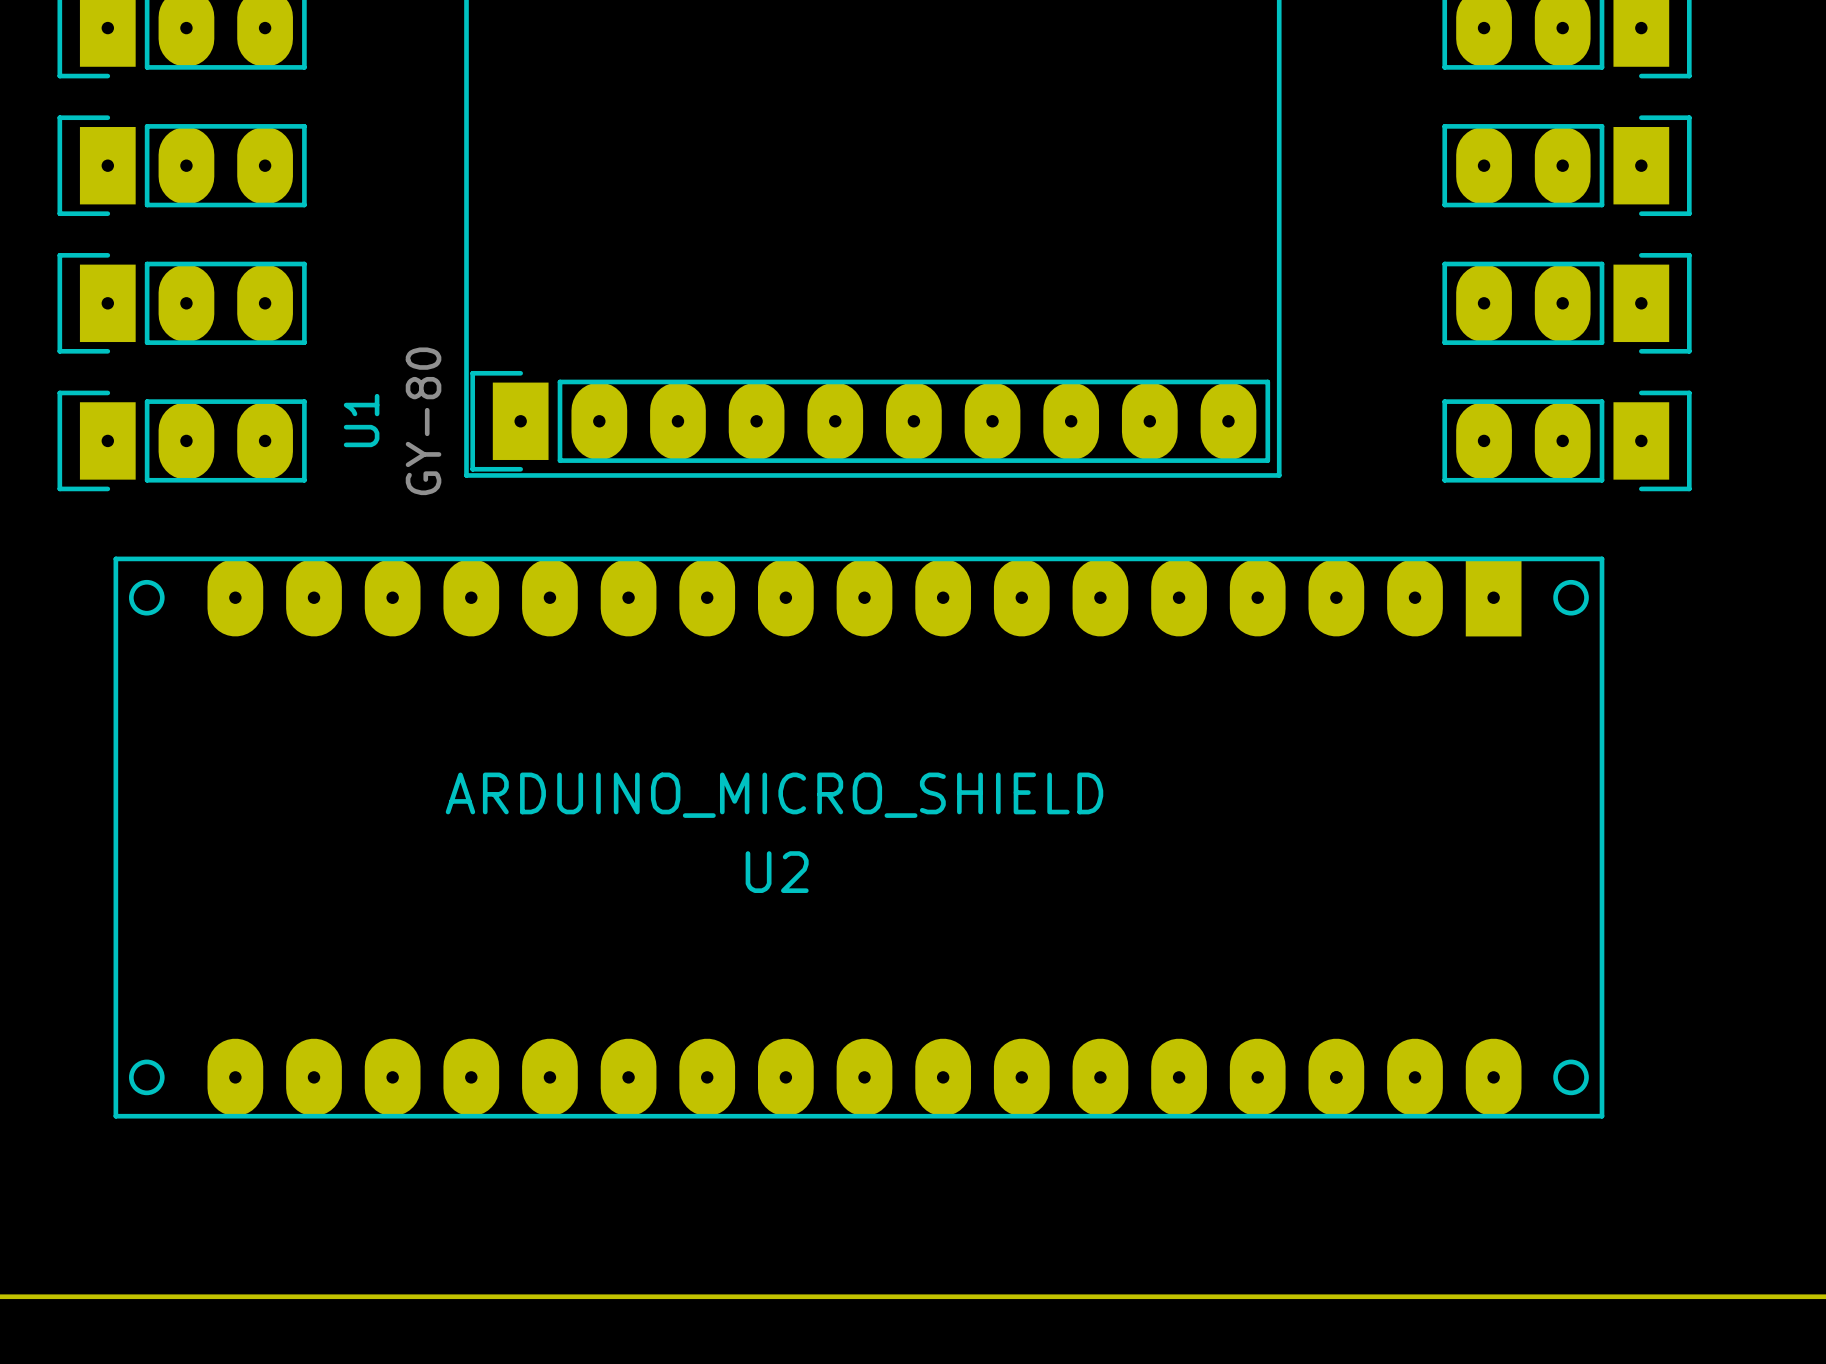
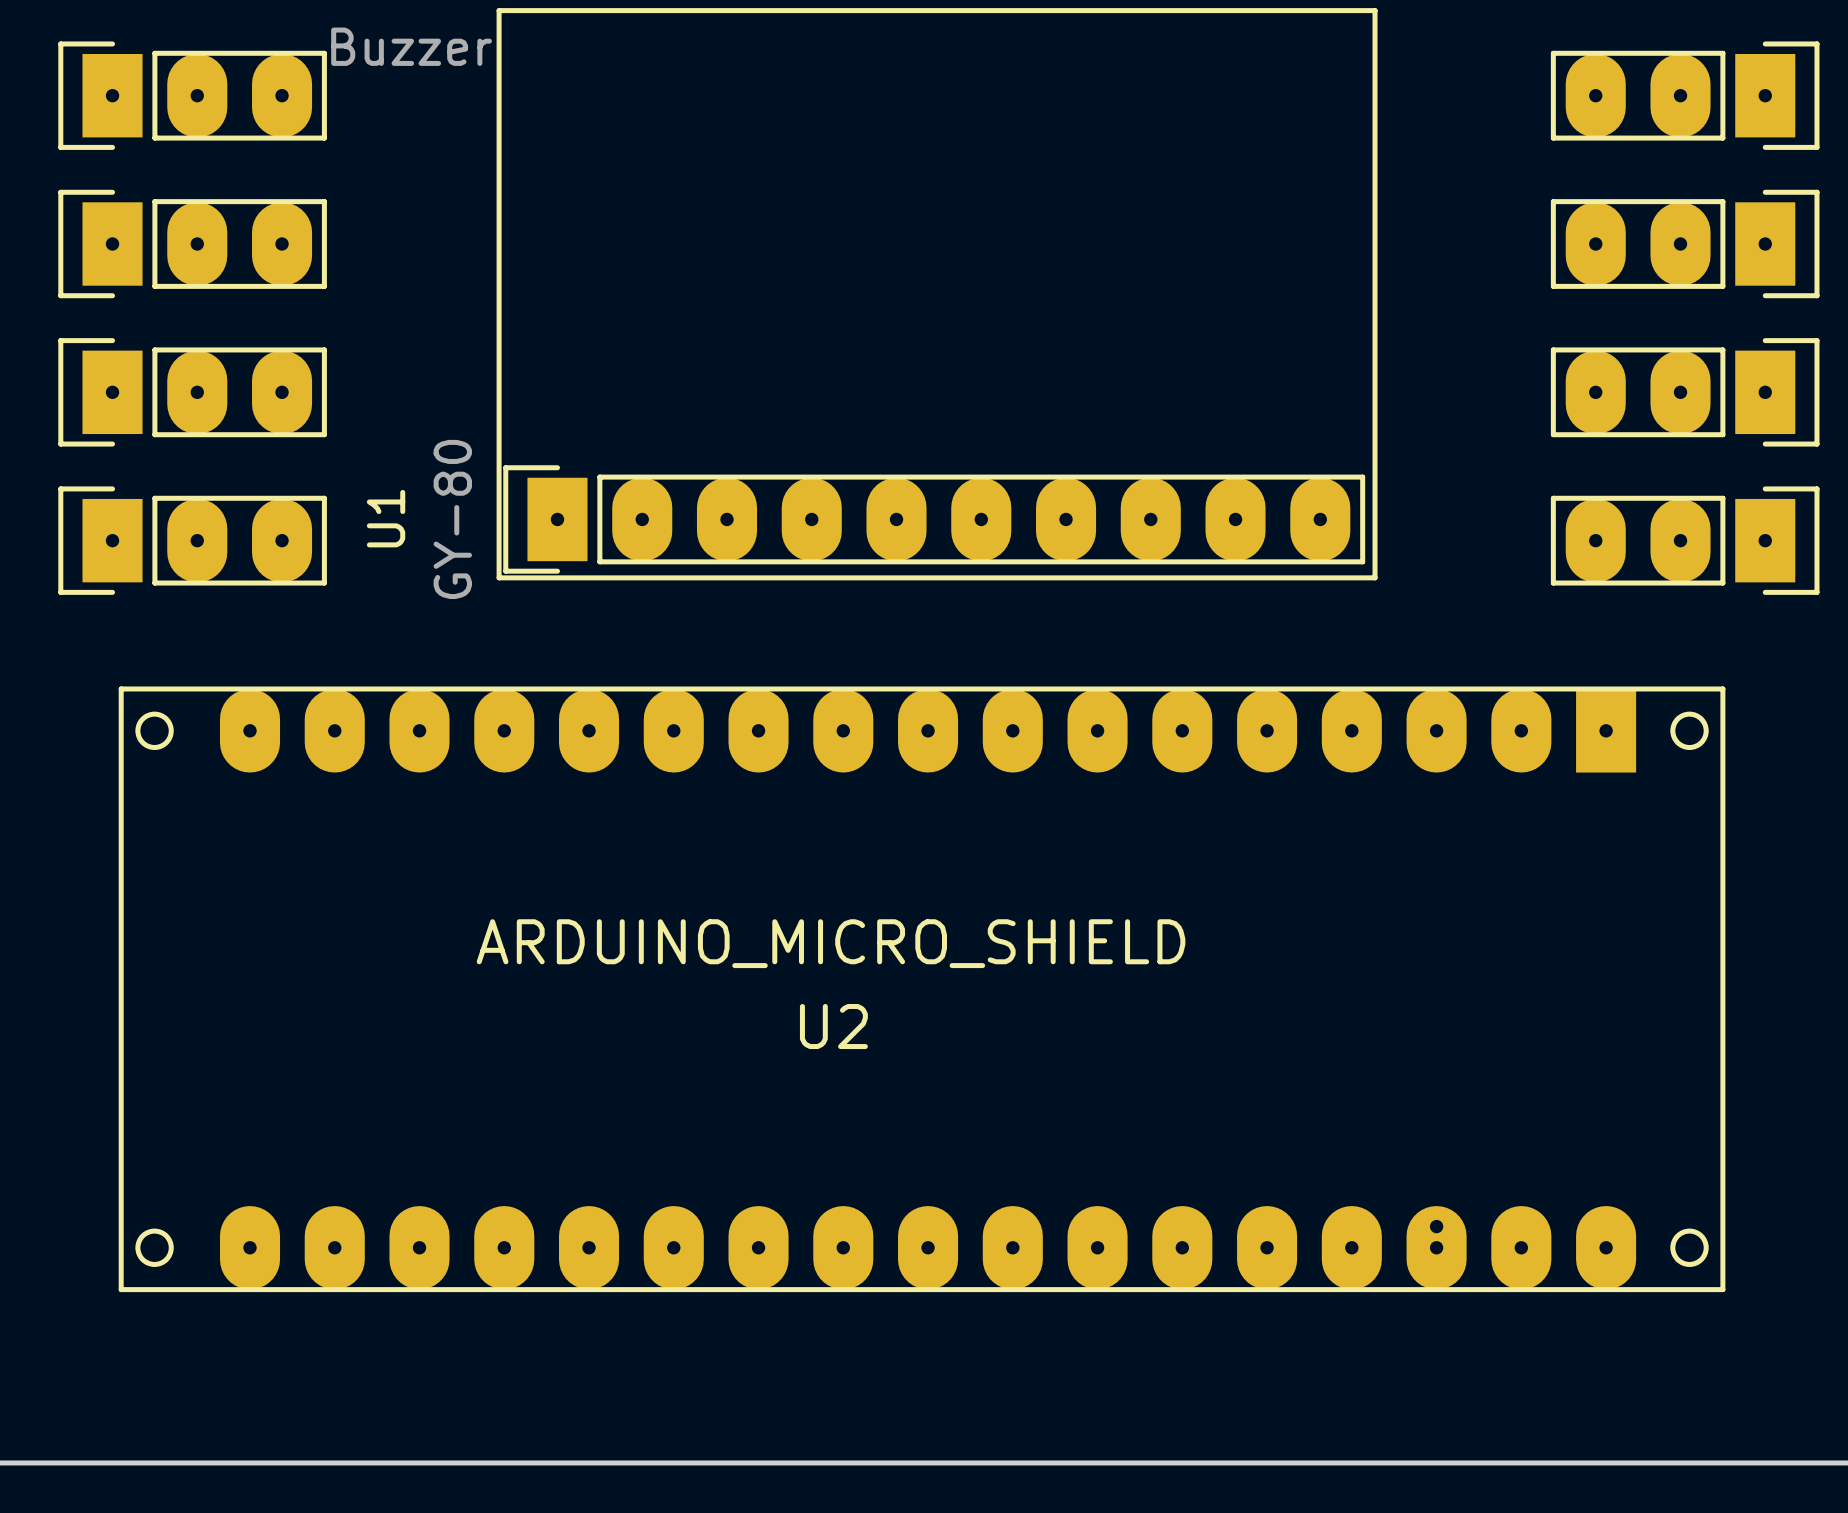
U2 position: (858, 837) -> (922, 989)

